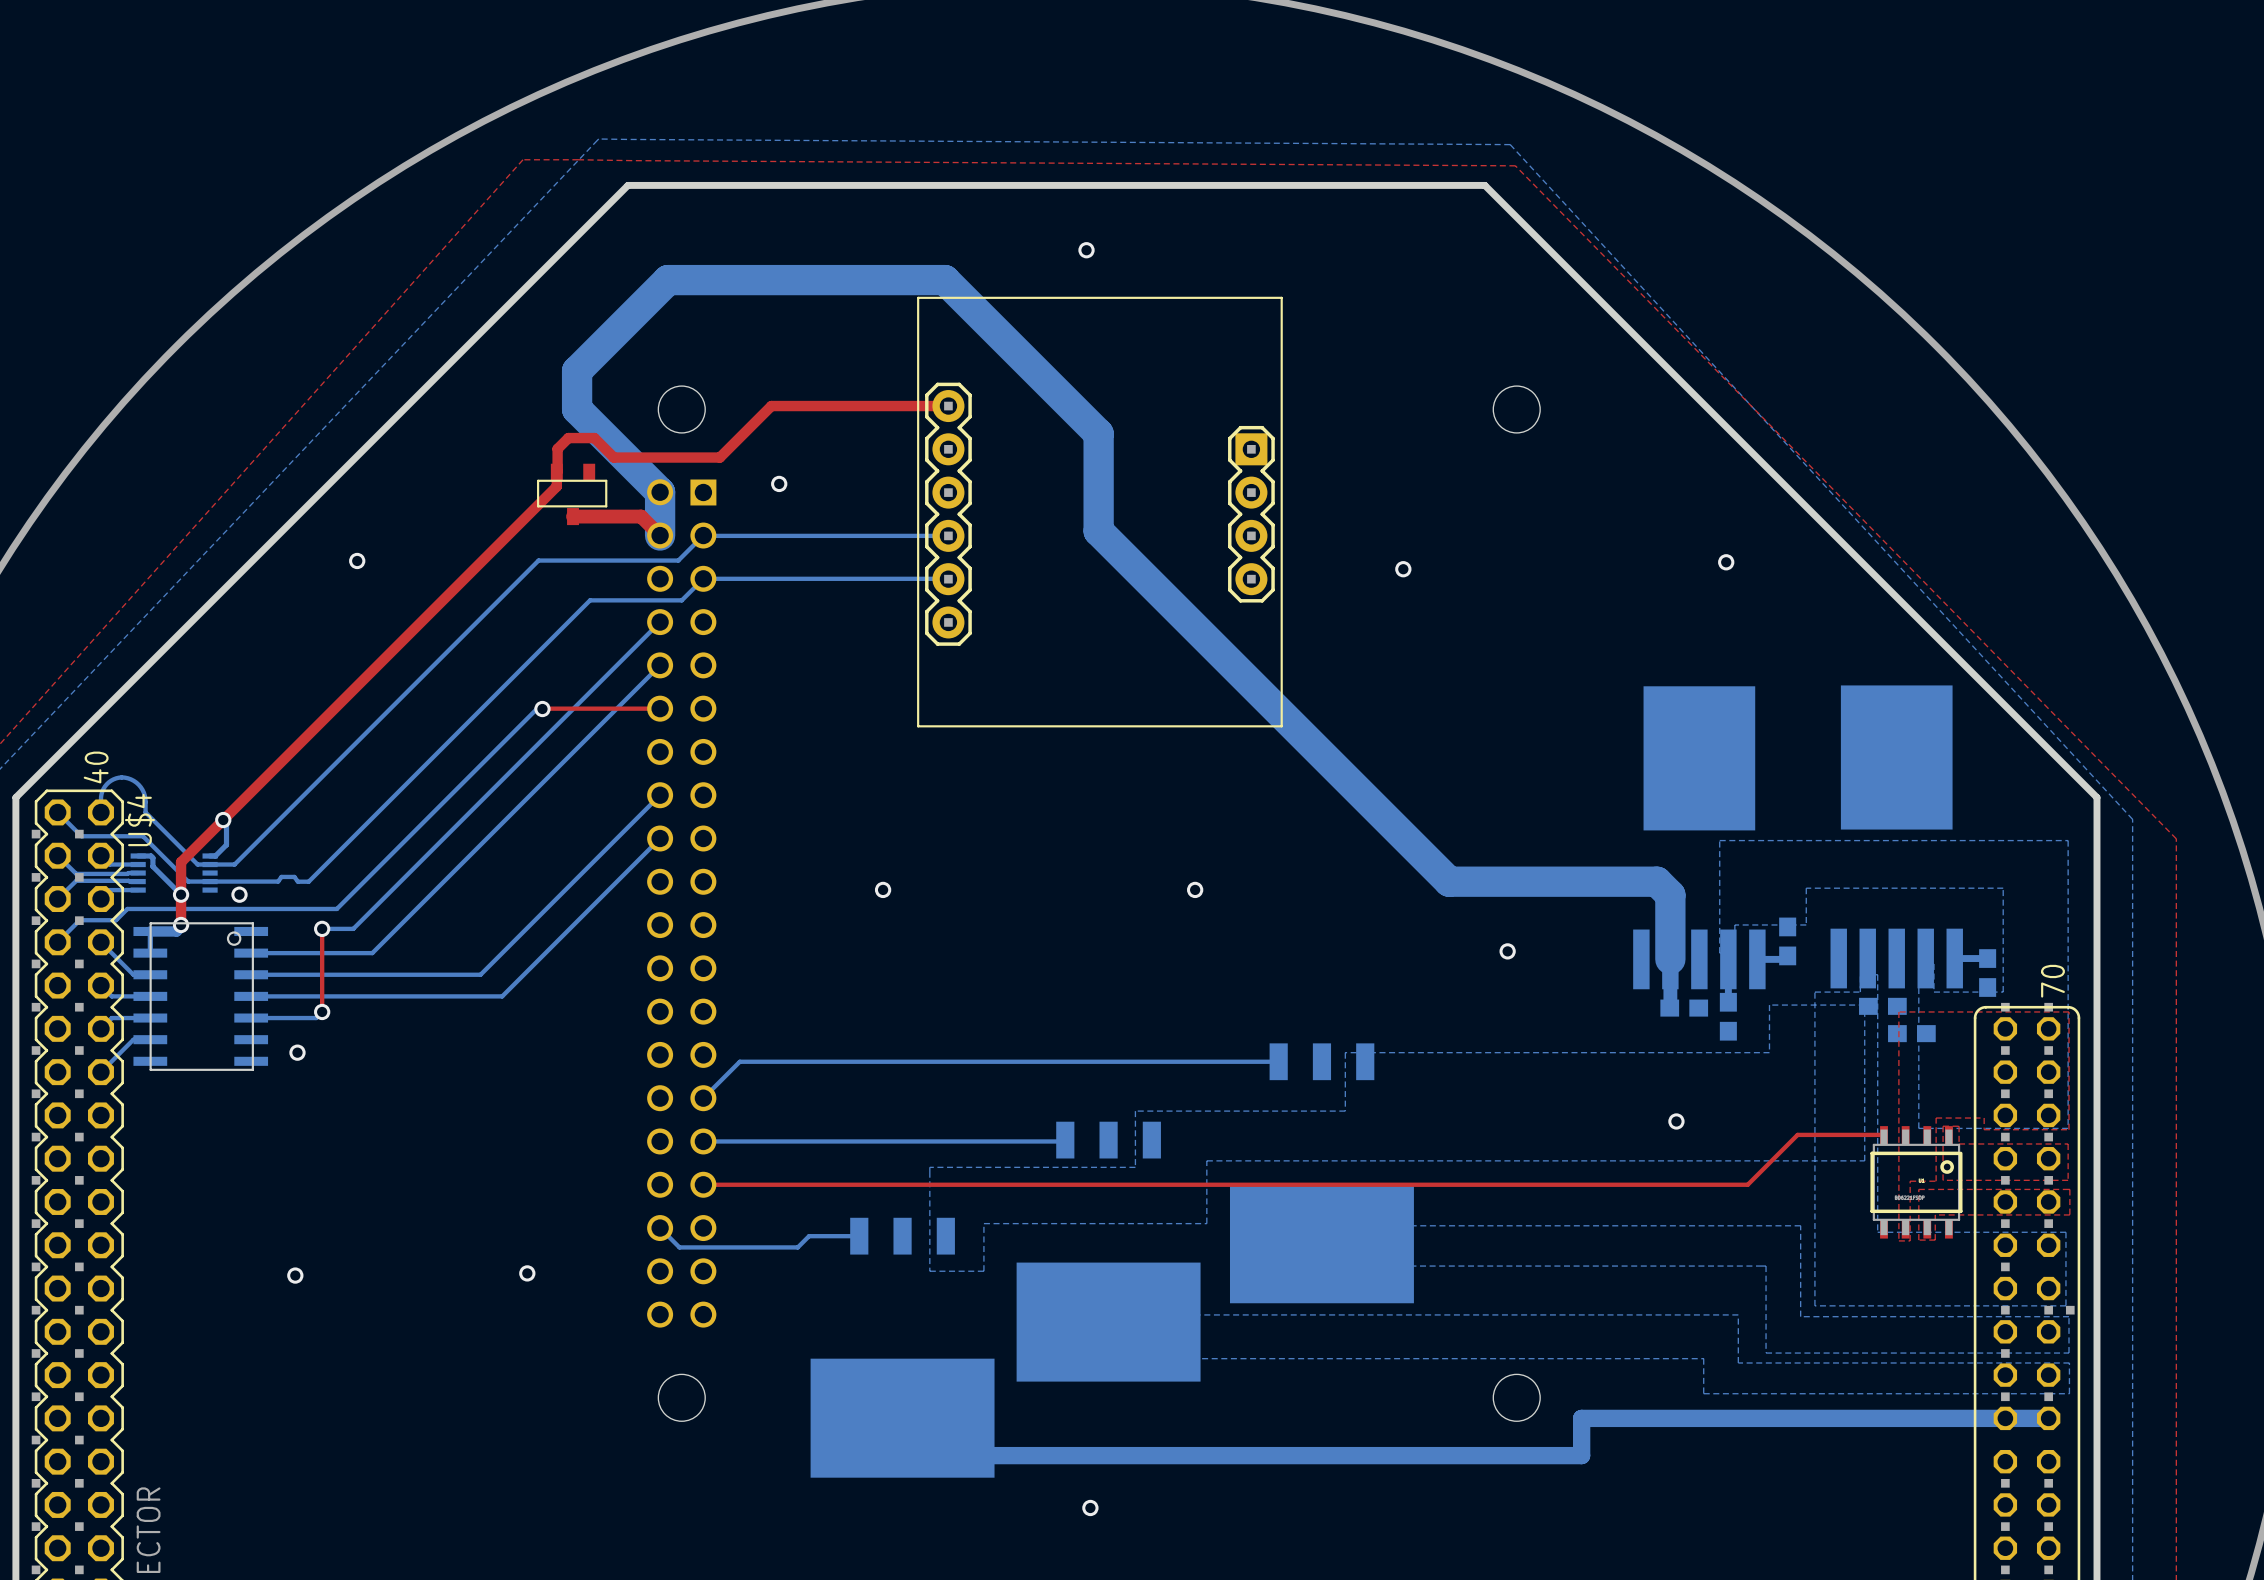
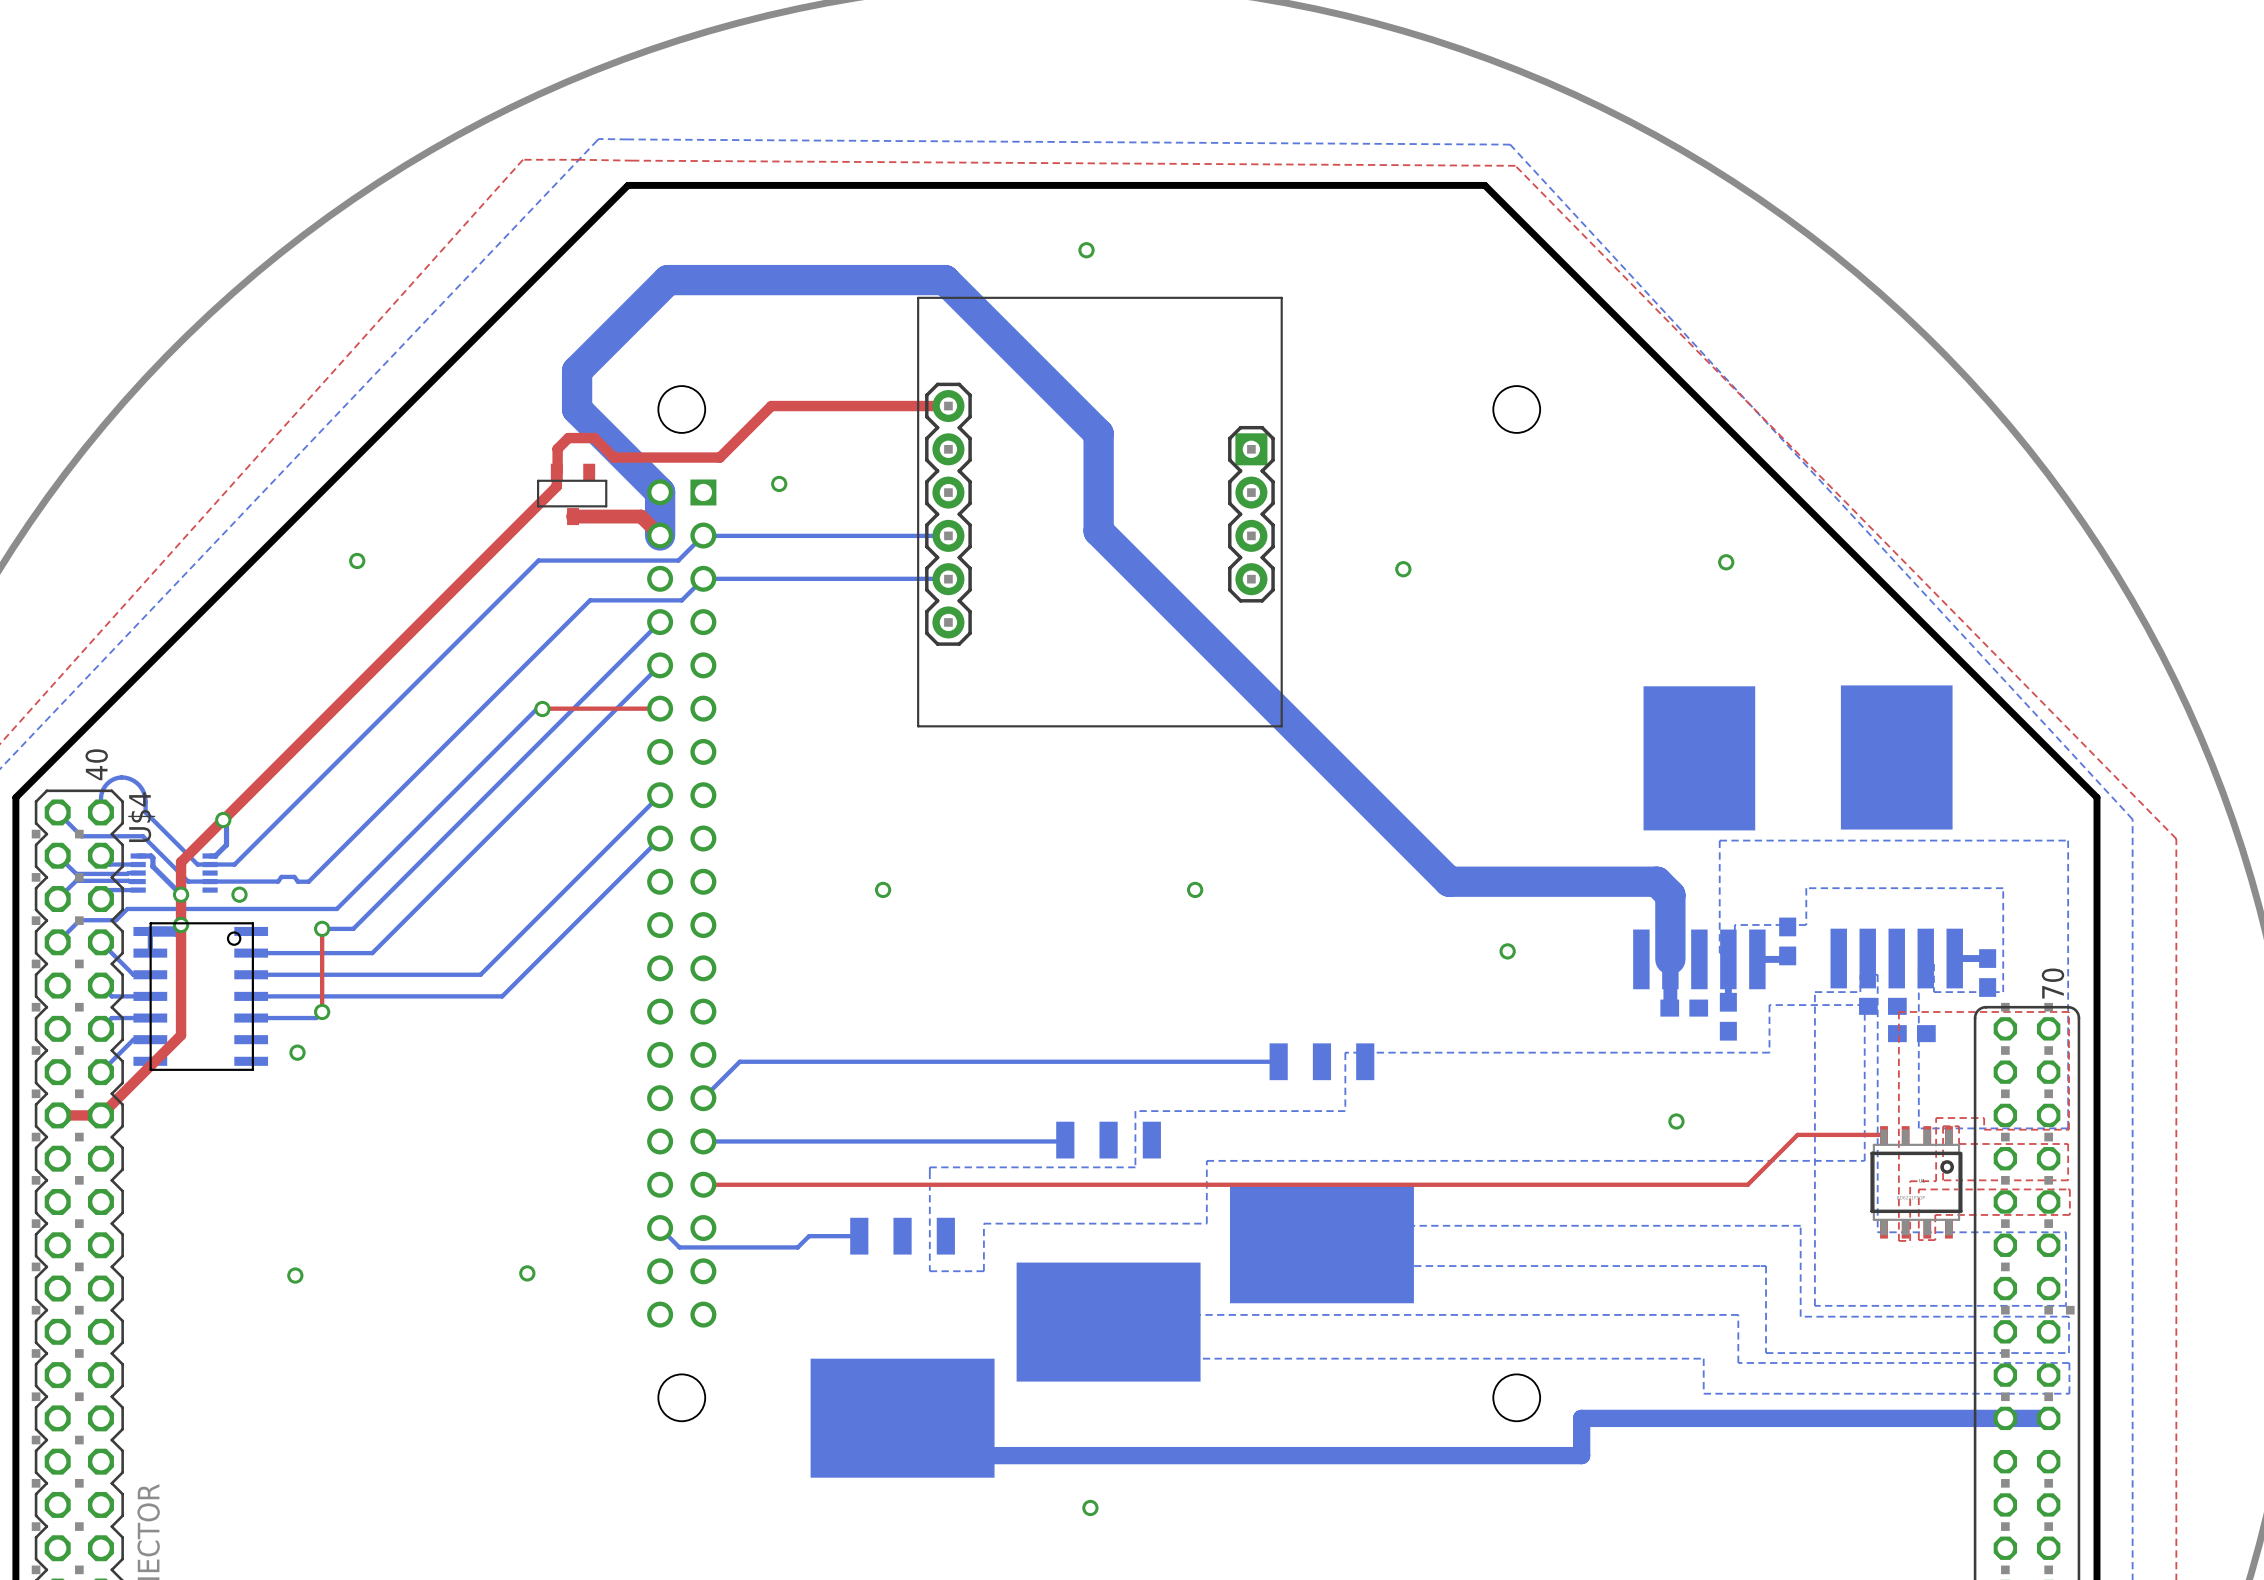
top track: none -> (181, 924) (181, 1035) (100, 1115) (57, 1115)

